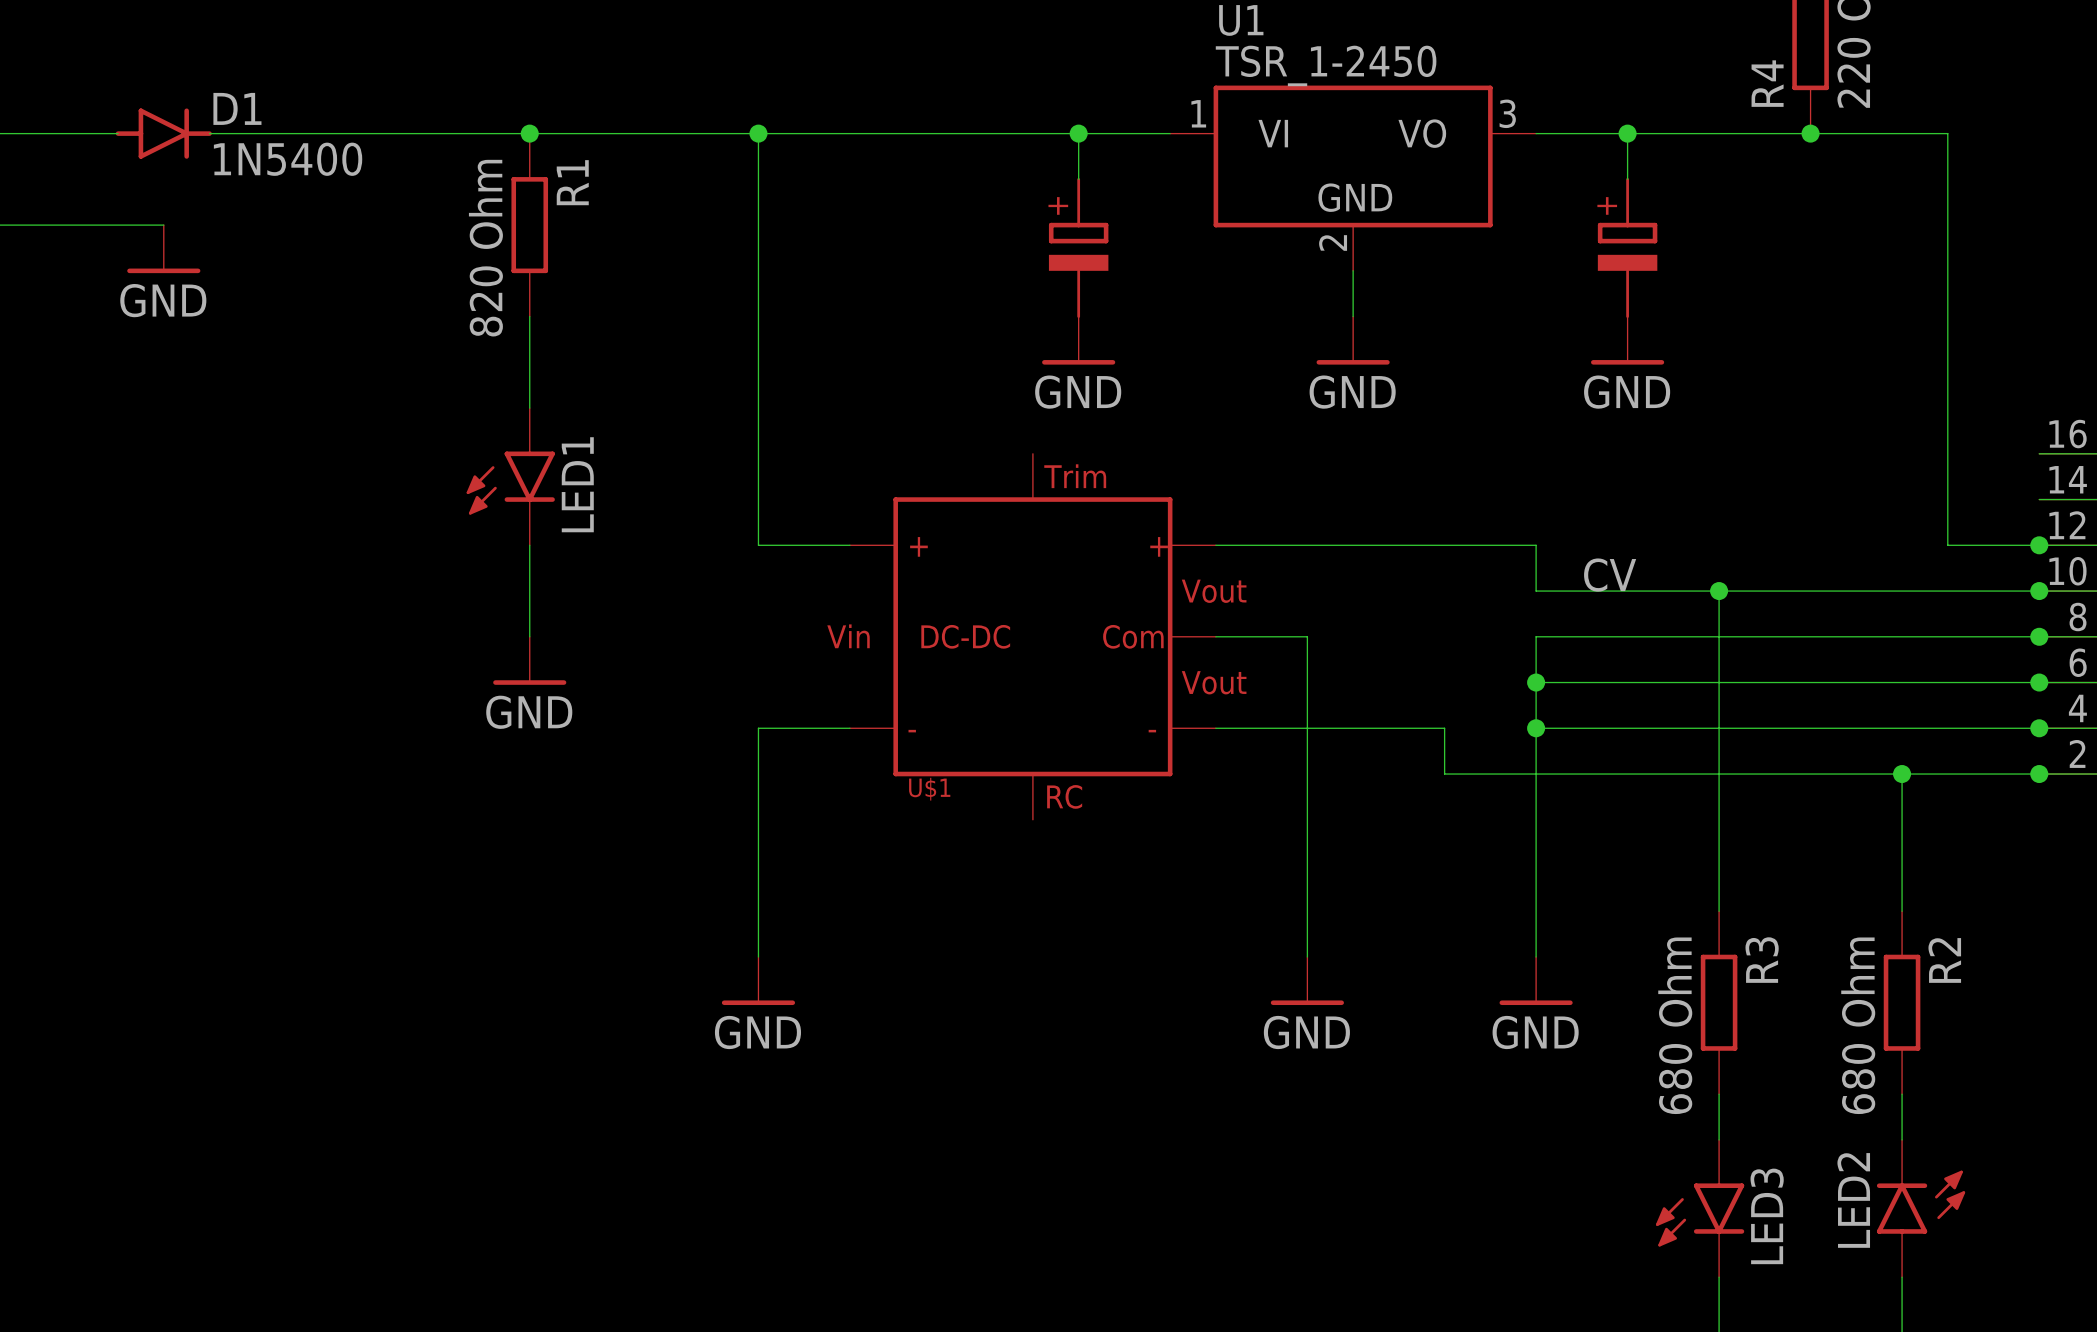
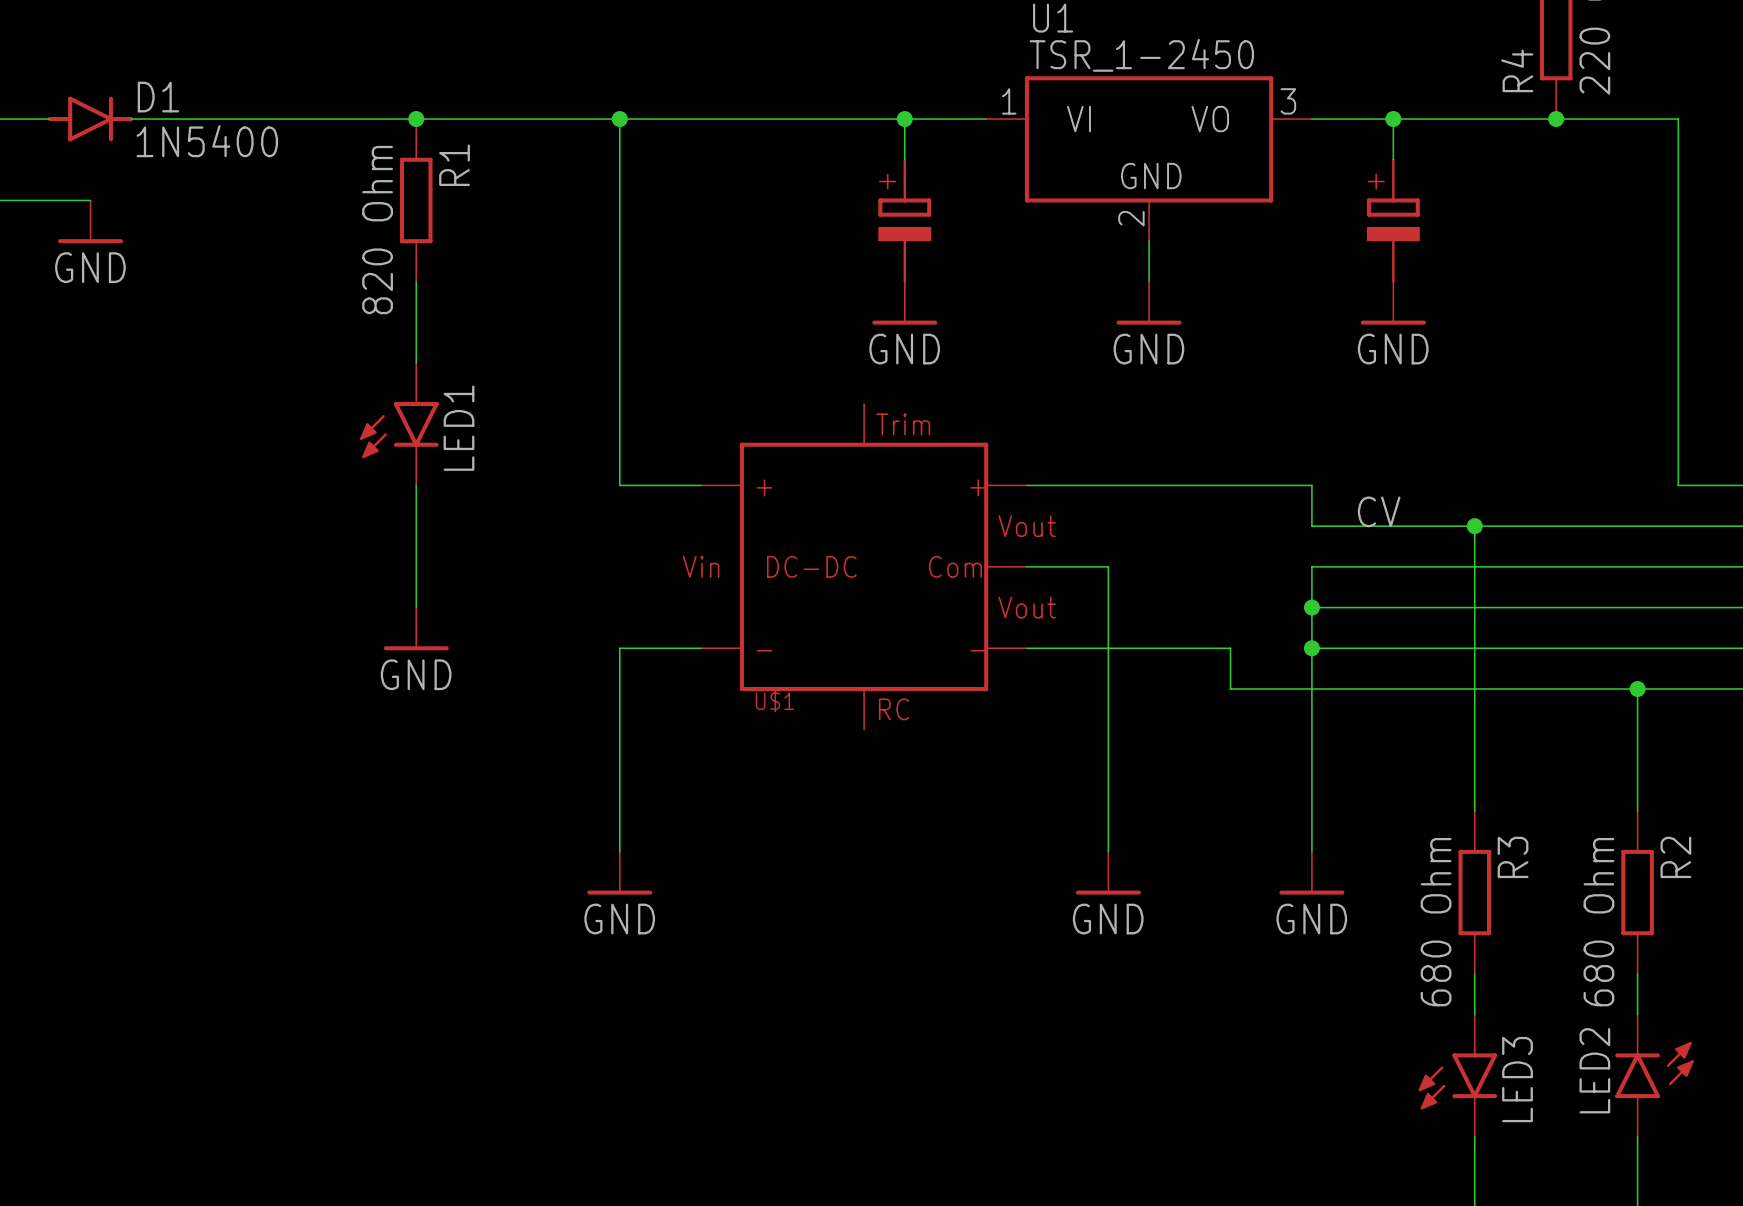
power symbol position: GND (529, 660) -> GND (416, 628)

